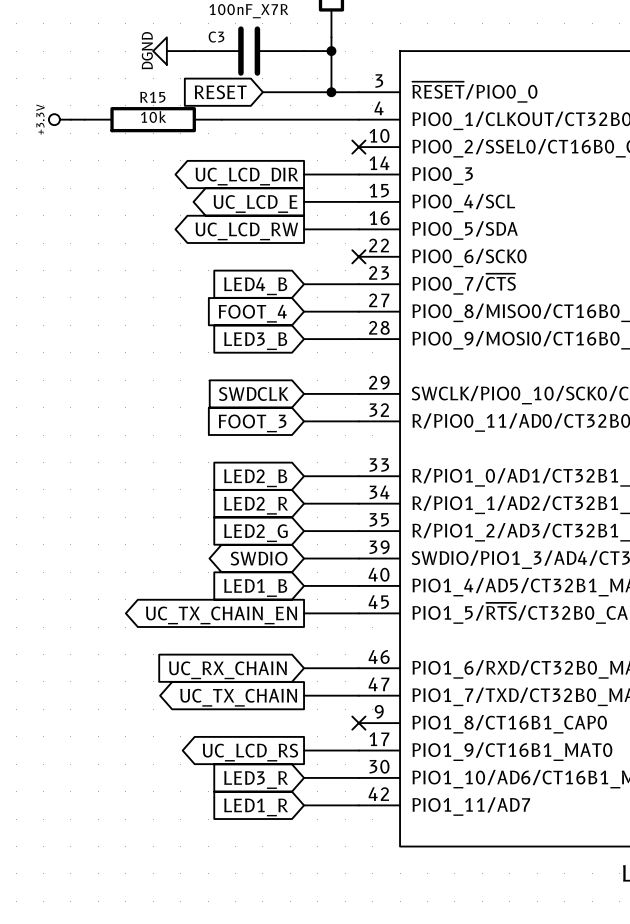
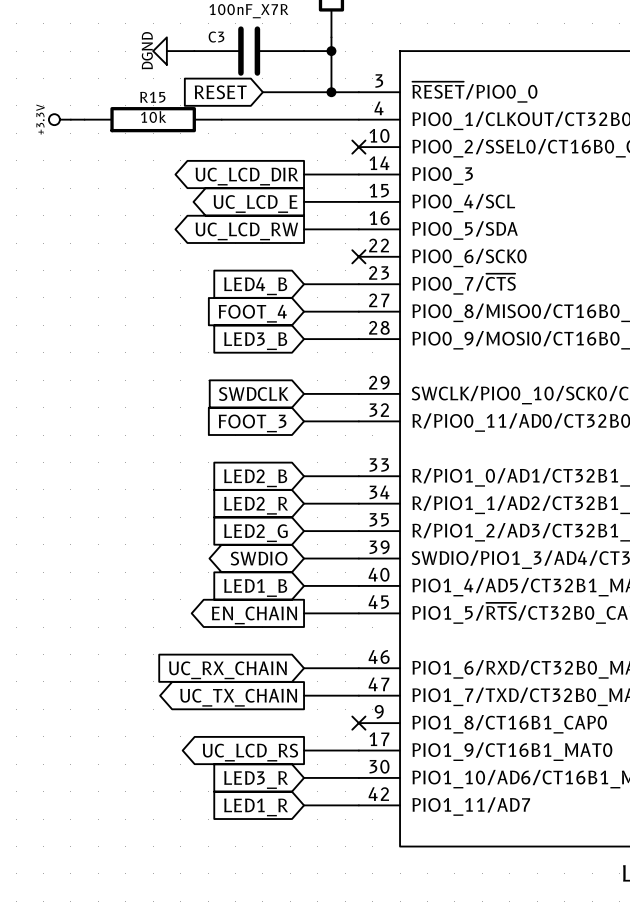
global label: UC_TX_CHAIN_EN (221, 615) -> EN_CHAIN (254, 615)

